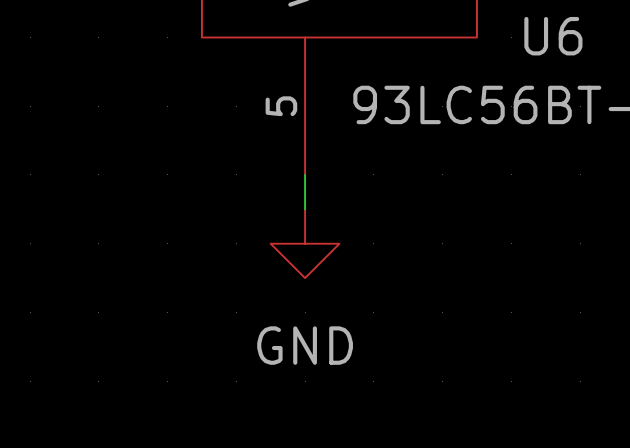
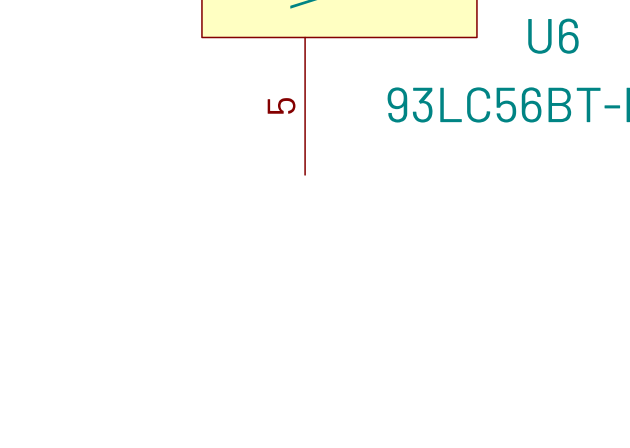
wire: (305, 174) (305, 209) -> none
power symbol: GND (305, 243) -> none

